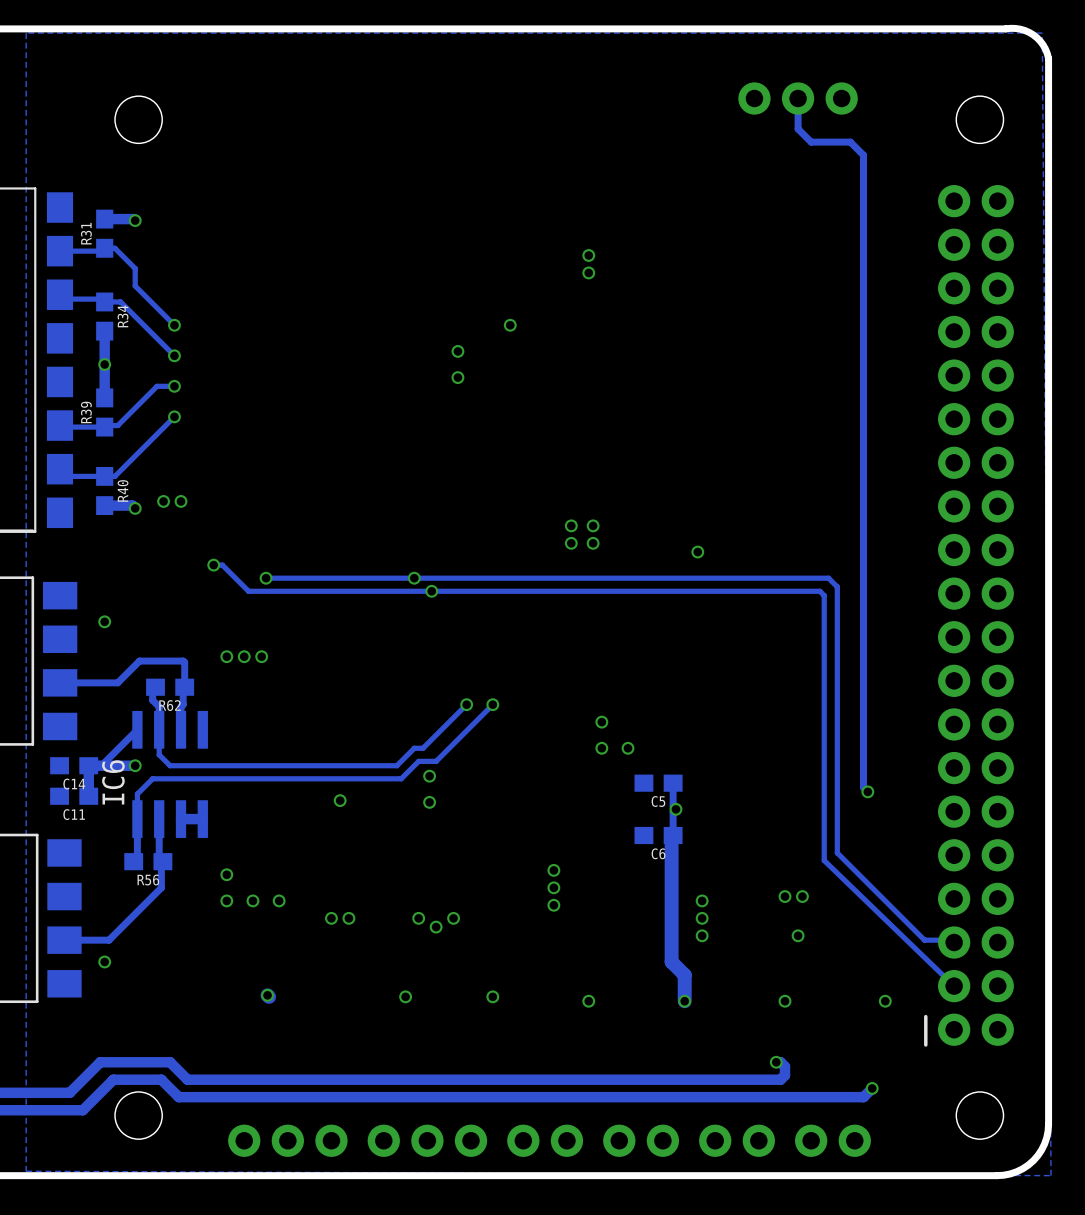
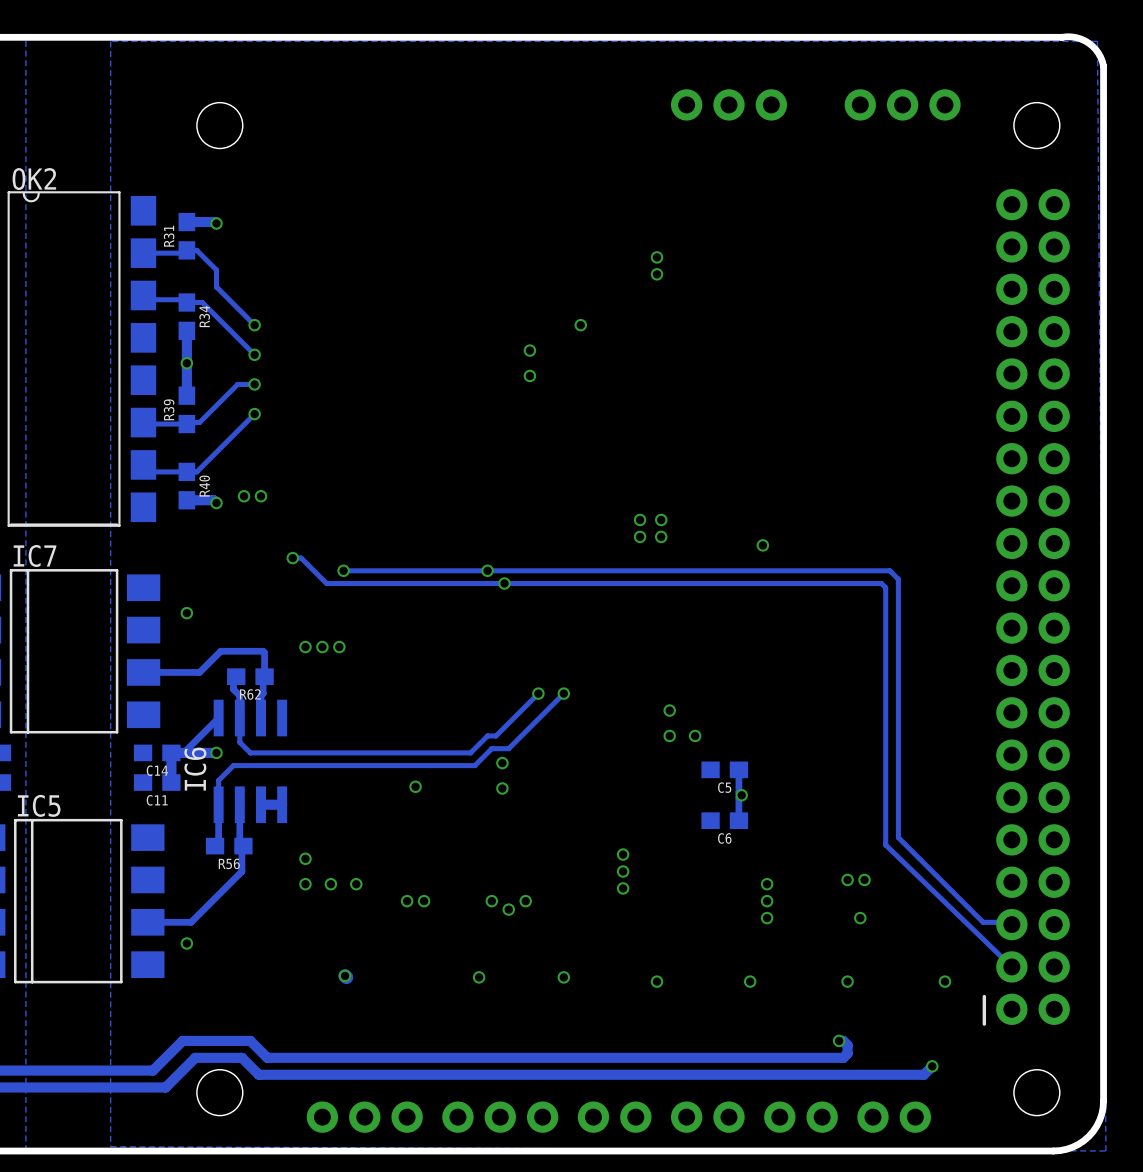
part: none -> (728, 104)
track: (798, 98) (798, 129) (811, 142) (850, 142) (863, 155) (863, 787) (867, 791) -> none
part position: (798, 98) -> (902, 104)
via: (867, 791) -> none
track: (673, 835) (671, 961) (684, 975) (684, 1001) -> none

